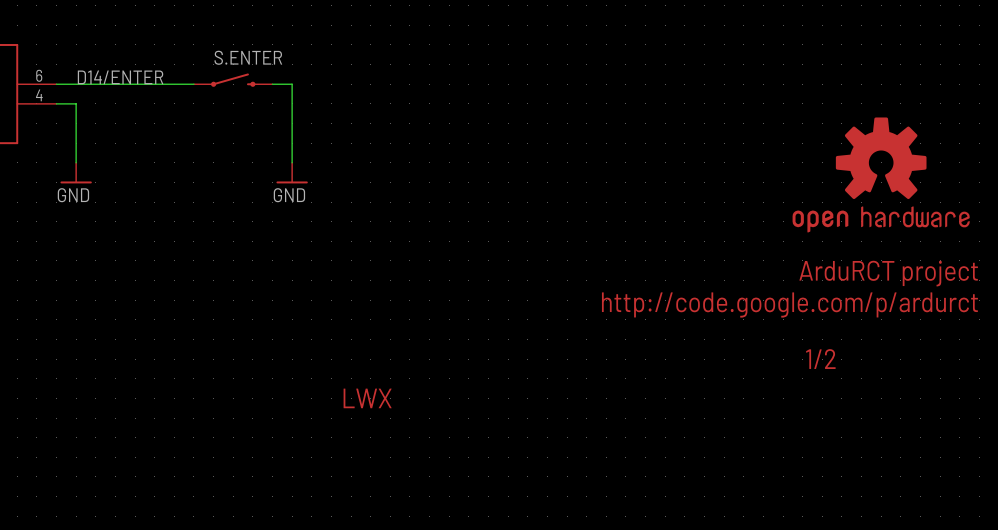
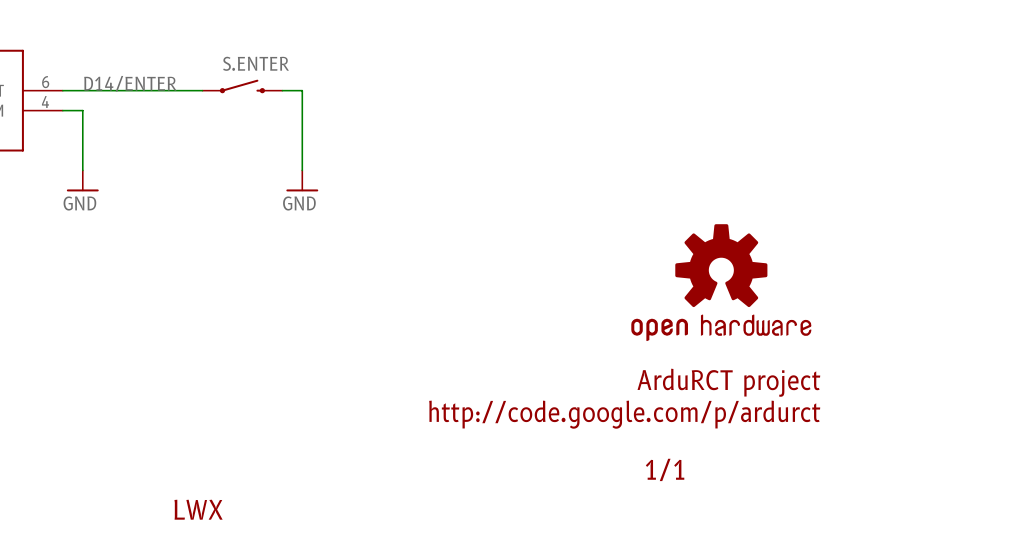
part: (881, 174) -> none
part: none -> (721, 282)
text: ArduRCT project (888, 273) -> none
text: http://code.google.com/p/ardurct (789, 305) -> none
text: 1/2 (820, 359) -> none
text: none -> ArduRCT project (728, 382)
text: LWX (367, 398) -> none
text: none -> http://code.google.com/p/ardurct (624, 414)
text: none -> 1/1 (665, 469)
text: none -> LWX (198, 509)

